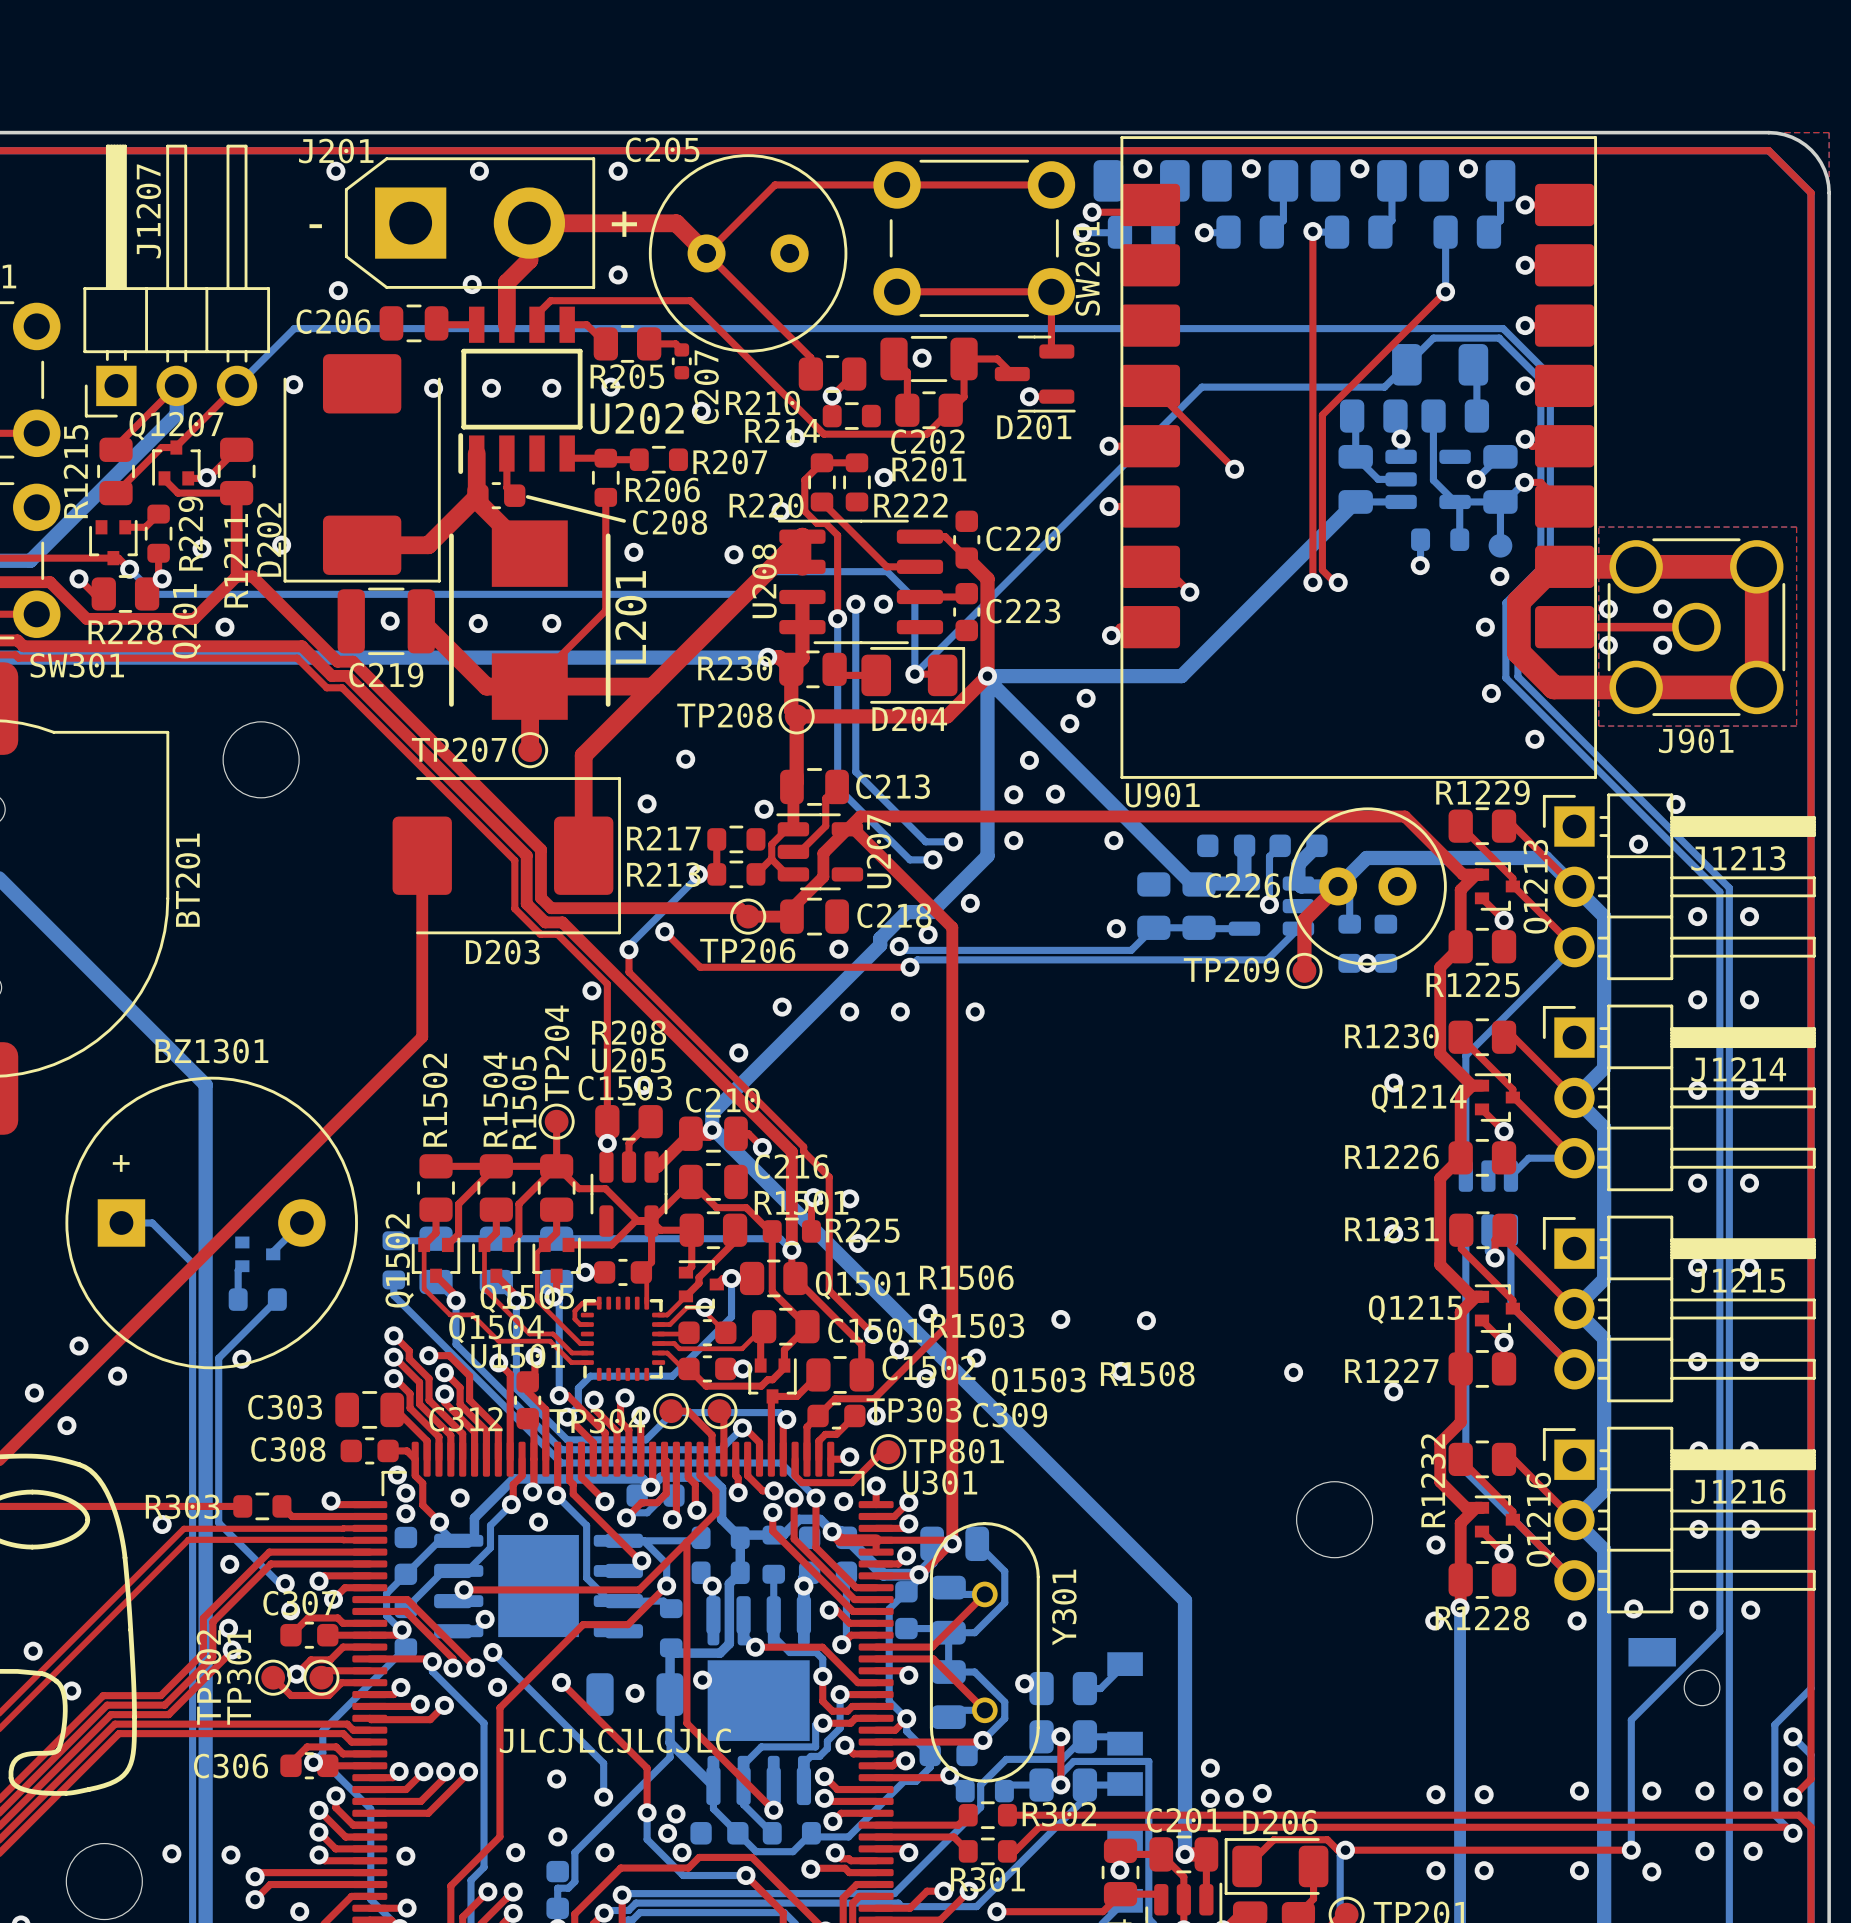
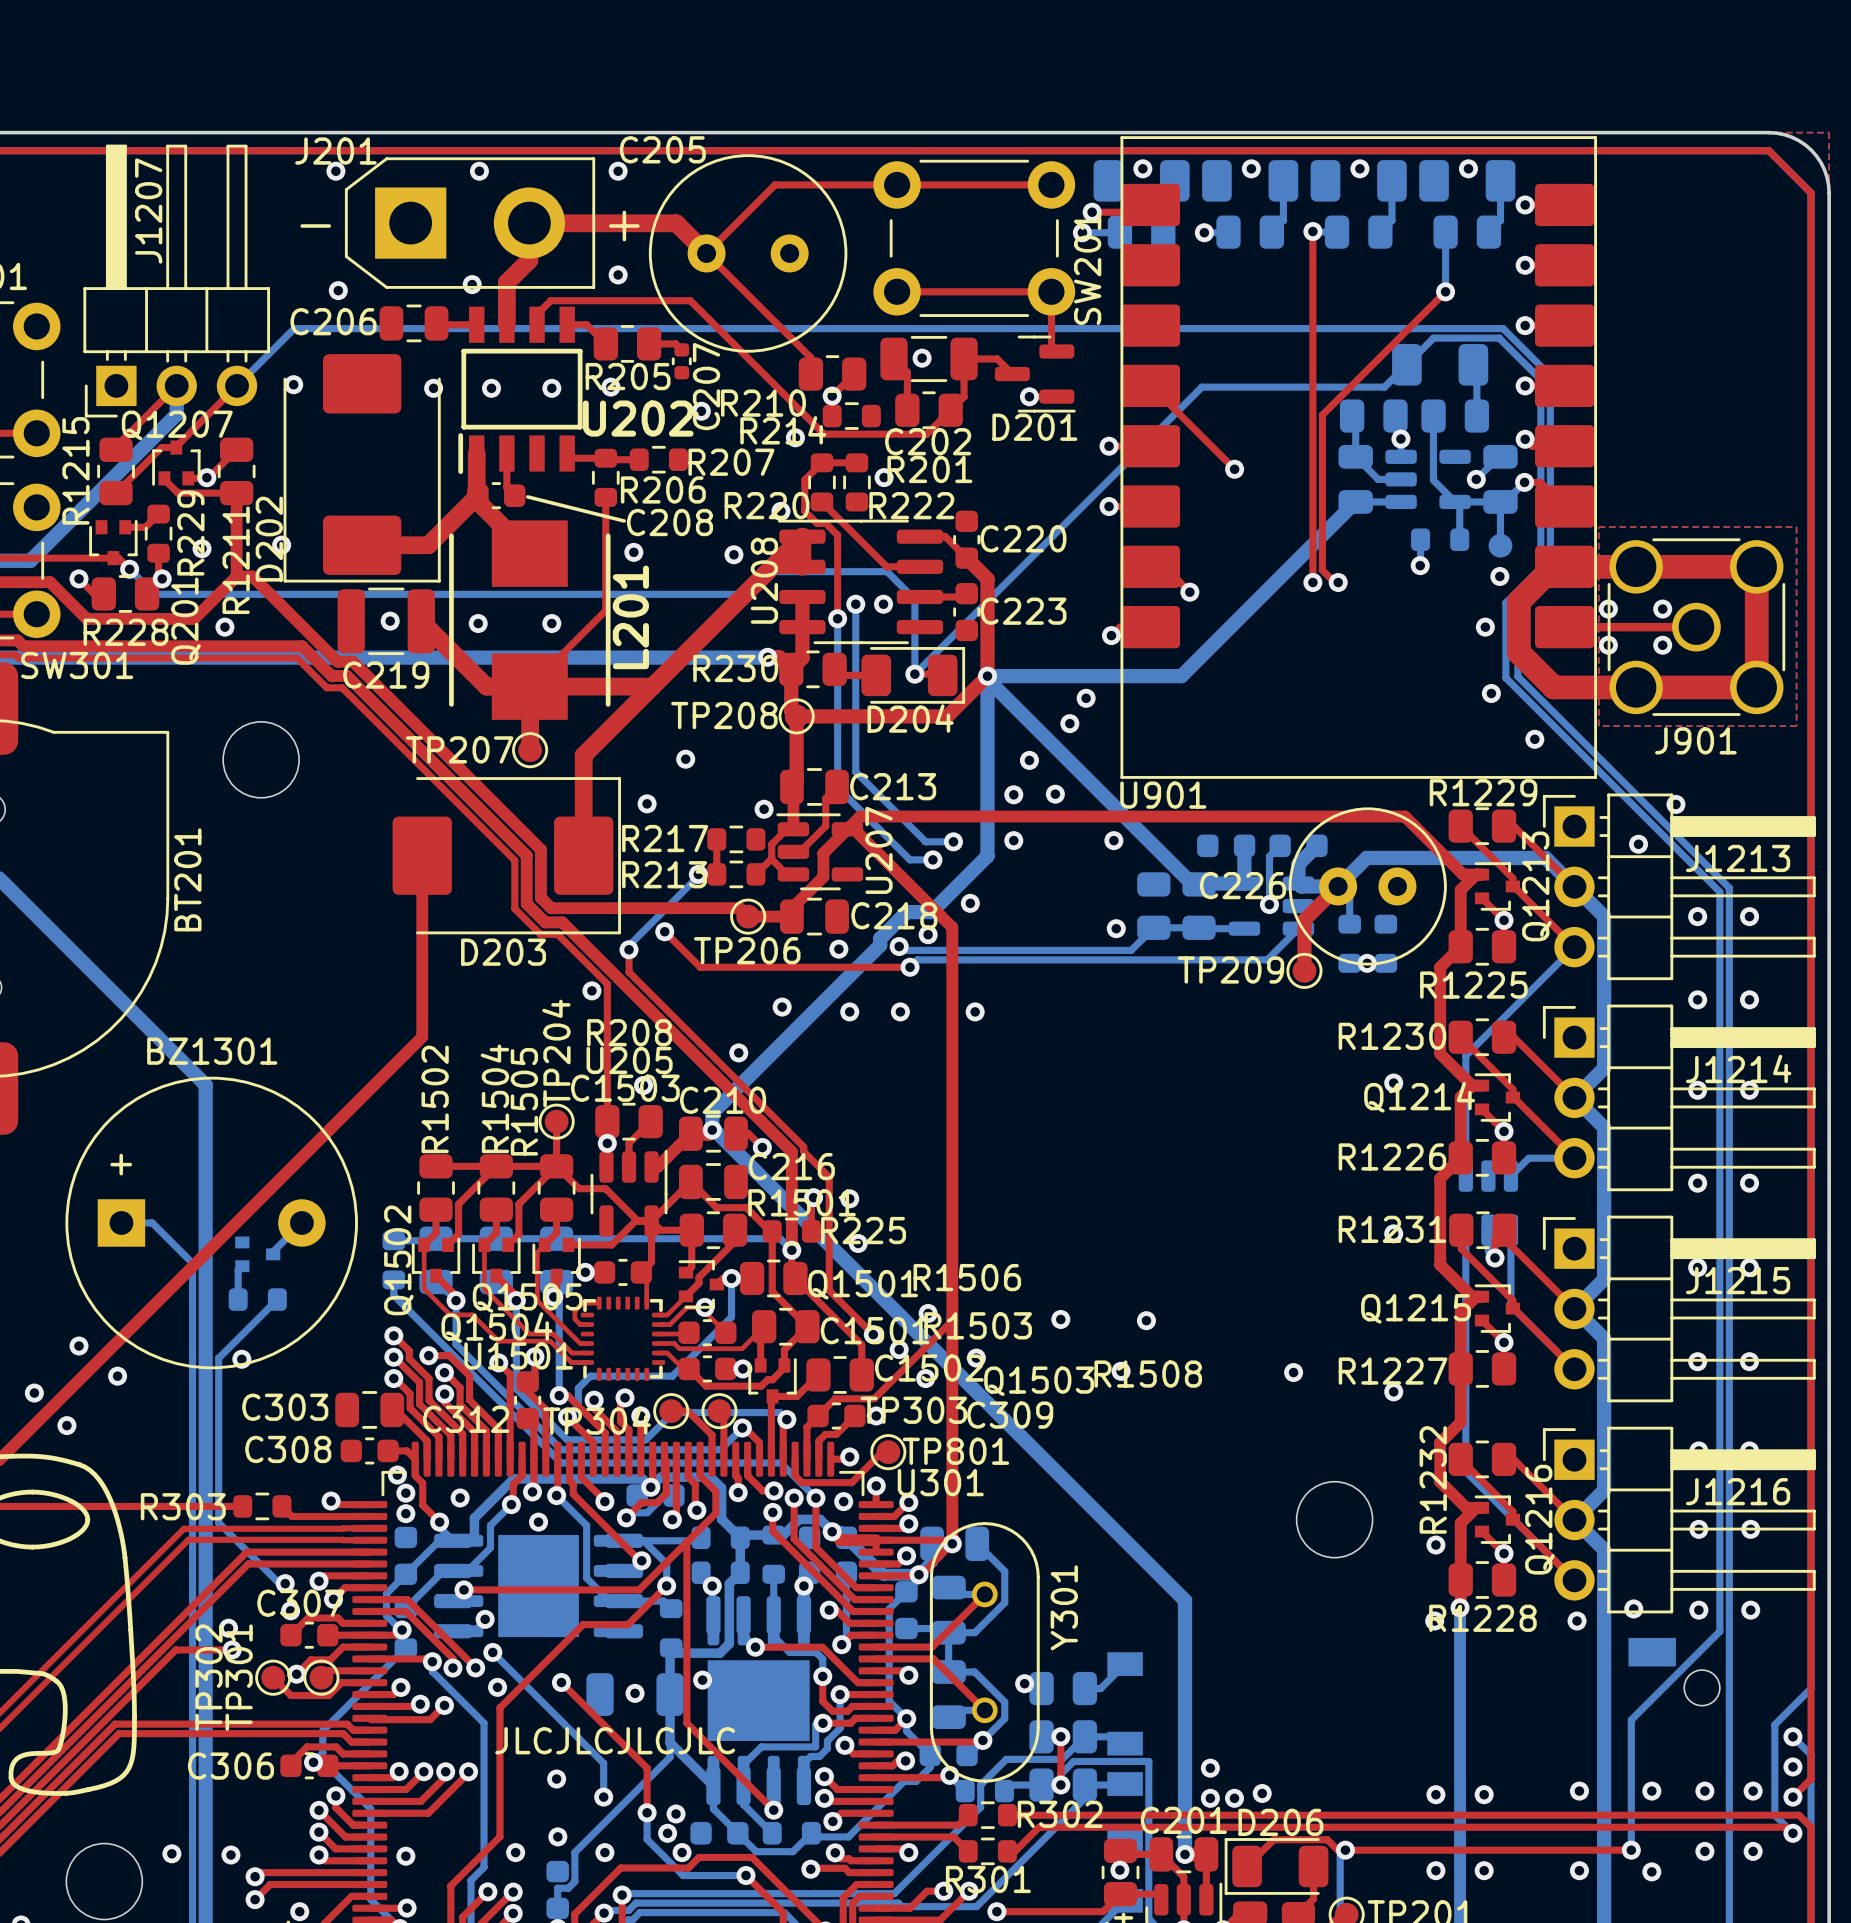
via: (162, 1524) -> none
top track: (269, 1552) (203, 1618) (203, 1653) (160, 1695) (103, 1695) -> (269, 1552) (246, 1552) (103, 1695)
top track: (270, 1563) (212, 1622) (212, 1657) (164, 1705) (107, 1705) -> (270, 1563) (248, 1563) (107, 1705)
via: (229, 1564) -> none
top track: (232, 1649) (168, 1714) (111, 1714) -> (232, 1649) (175, 1649) (111, 1714)
via: (33, 1651) -> none
via: (71, 1690) -> none

